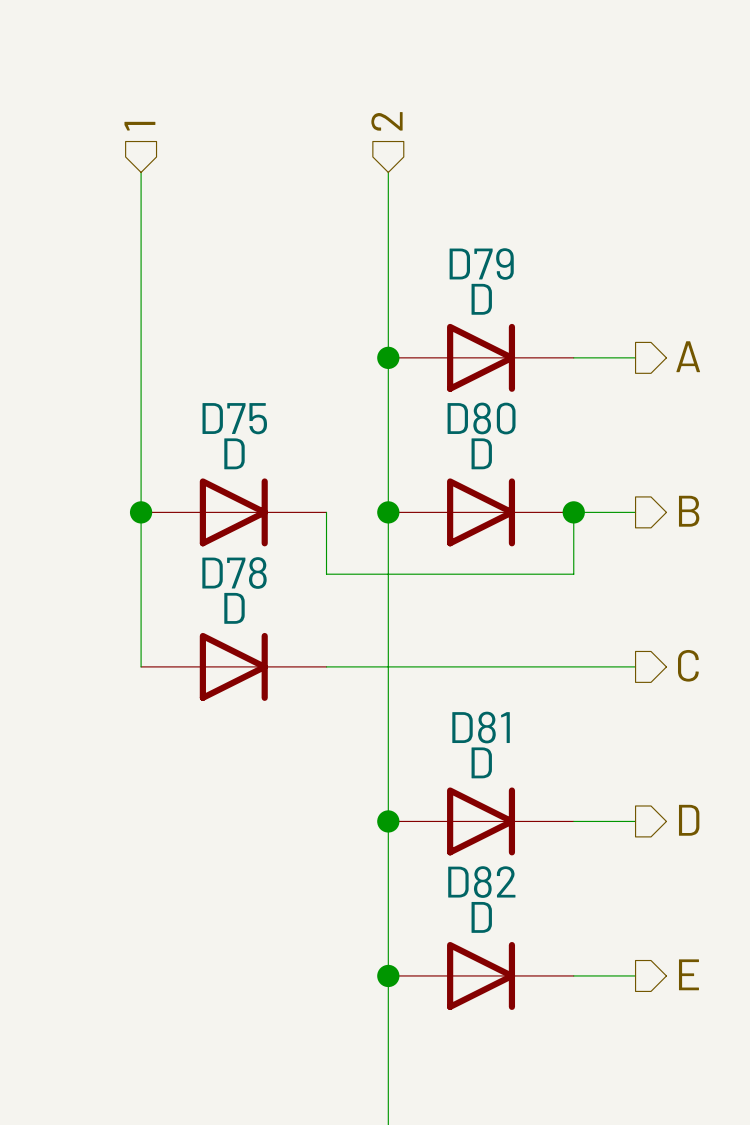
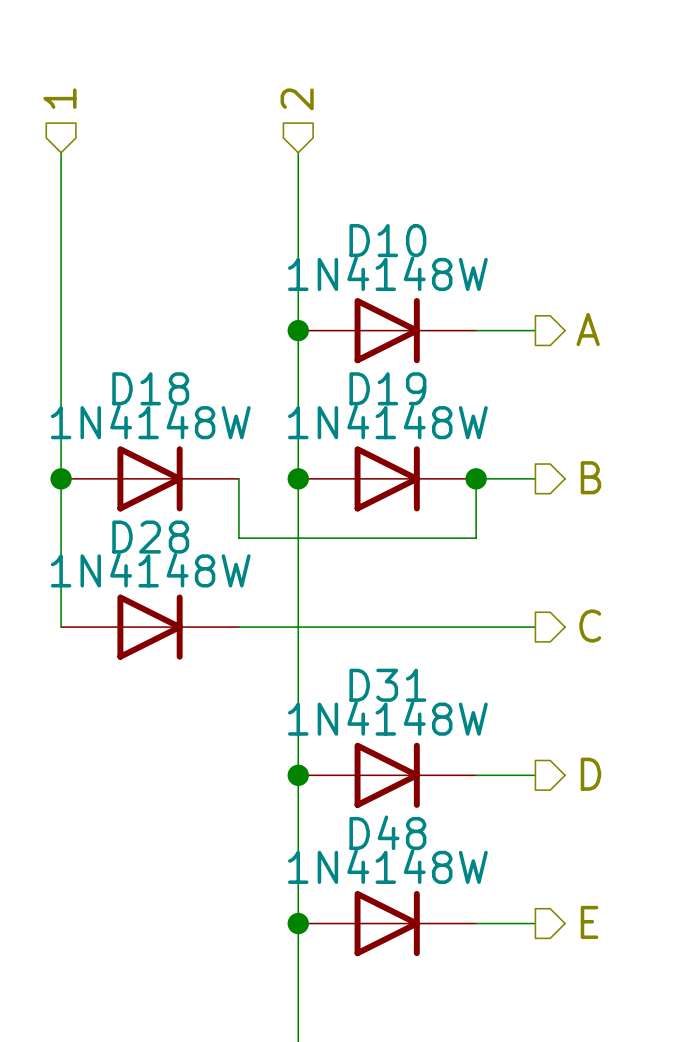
D79 name: D79 (481, 264) -> D10 (387, 240)
D79 value: D (481, 299) -> 1N4148W (387, 273)
D75 name: D75 (234, 418) -> D18 (150, 388)
D80 name: D80 (481, 418) -> D19 (387, 388)
D75 value: D (234, 453) -> 1N4148W (150, 421)
D80 value: D (481, 453) -> 1N4148W (387, 421)
D78 name: D78 (234, 573) -> D28 (150, 537)
D78 value: D (234, 608) -> 1N4148W (150, 570)
D81 name: D81 (481, 727) -> D31 (387, 685)
D81 value: D (481, 762) -> 1N4148W (387, 718)
D82 name: D82 (481, 882) -> D48 (387, 832)
D82 value: D (481, 917) -> 1N4148W (387, 866)

